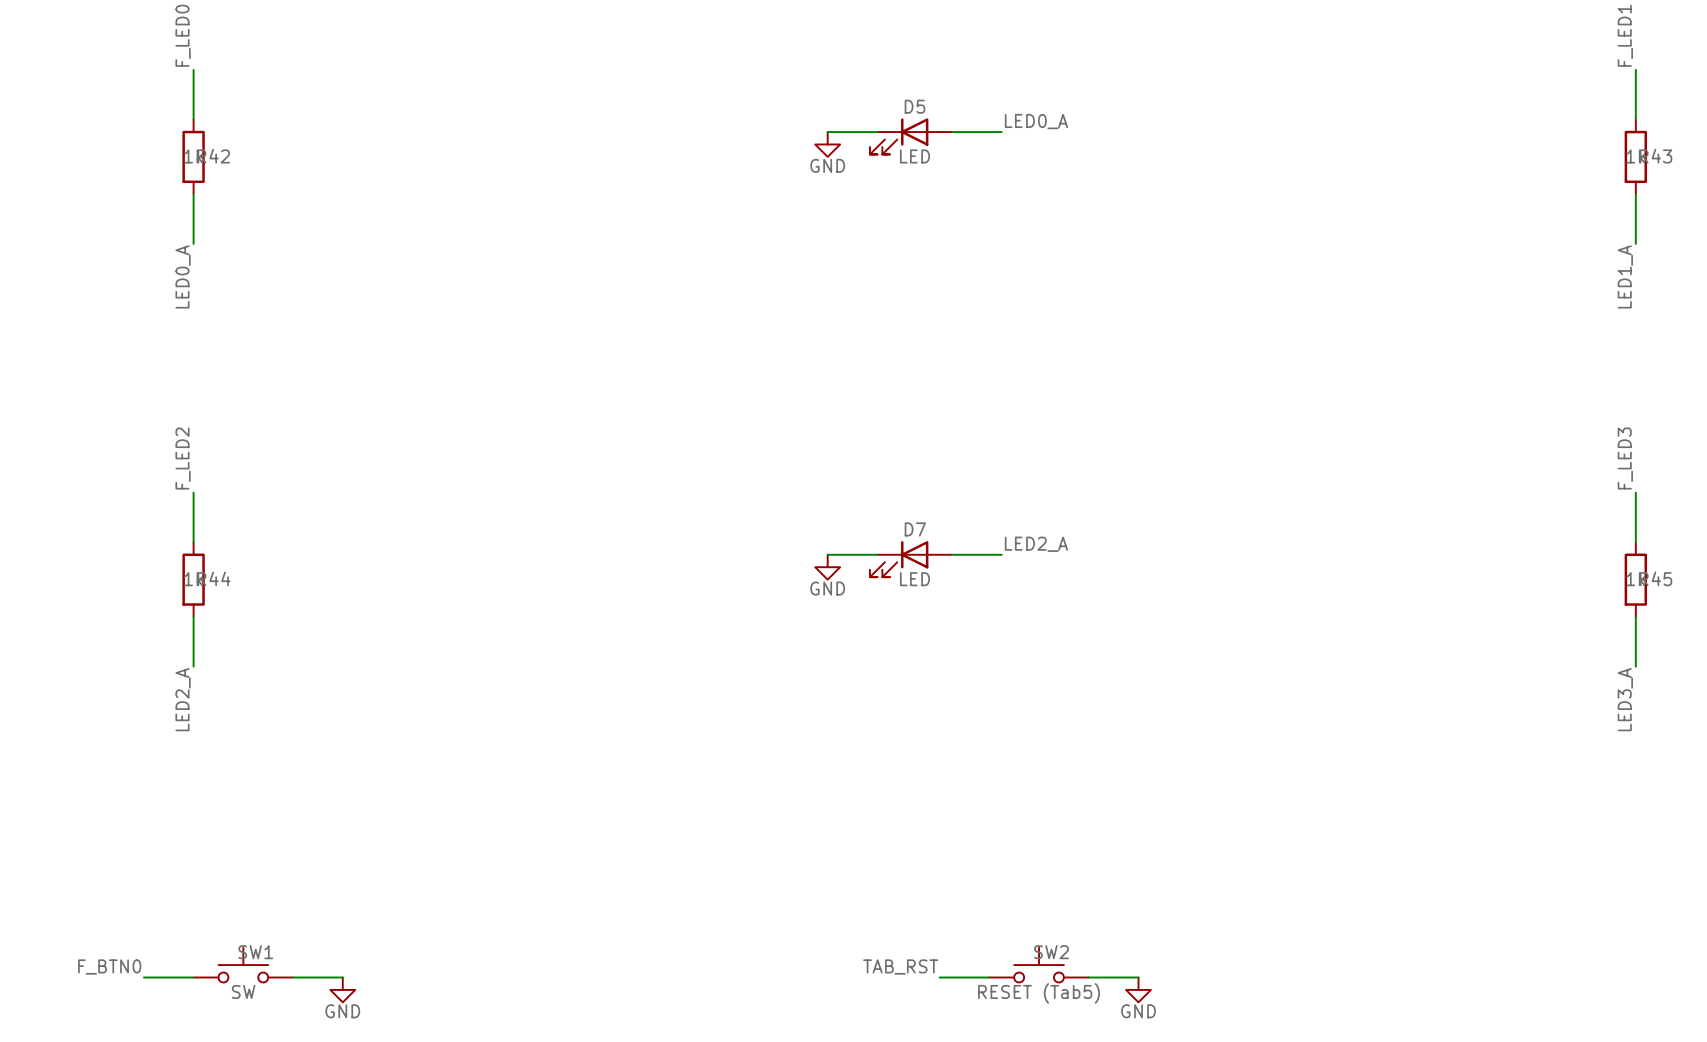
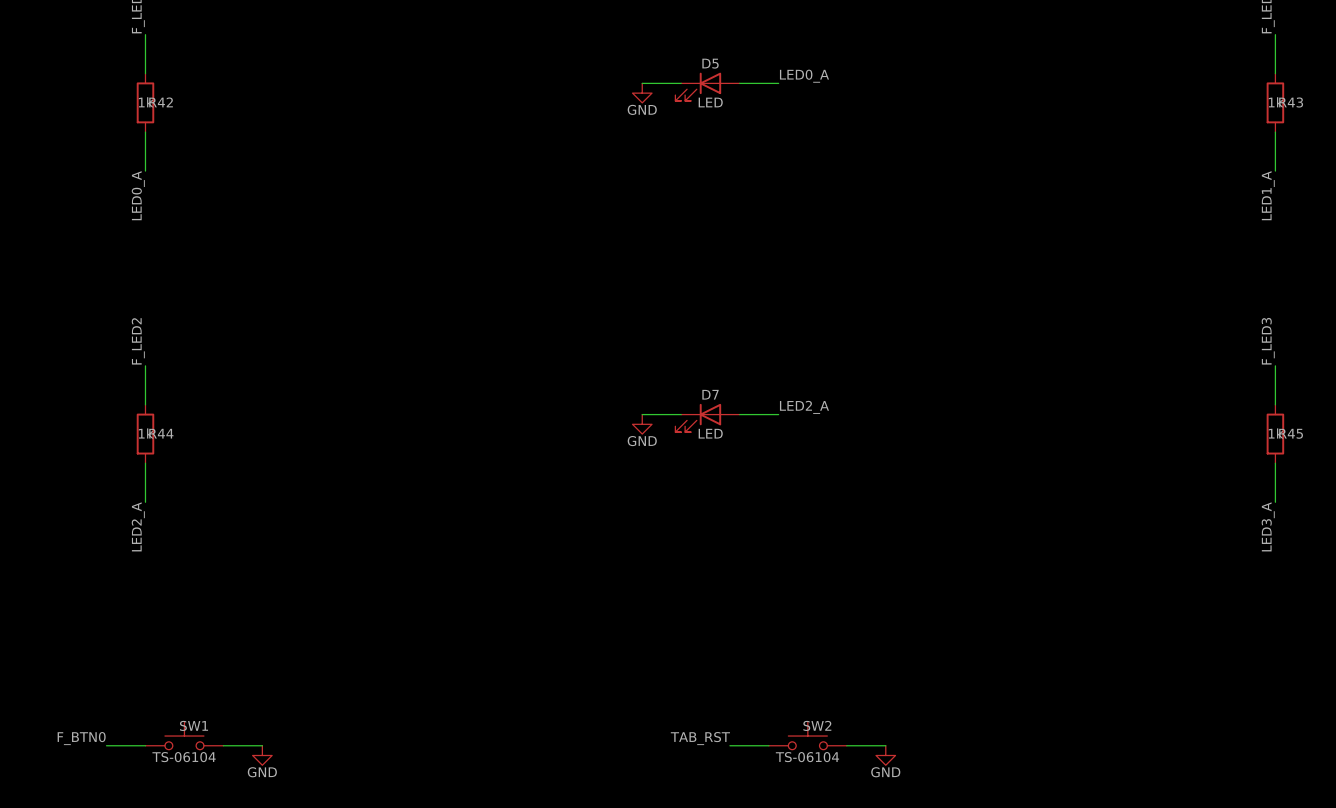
SW1 value: SW (243, 991) -> TS-06104 (184, 757)
SW2 value: RESET (Tab5) (1039, 993) -> TS-06104 (807, 757)

